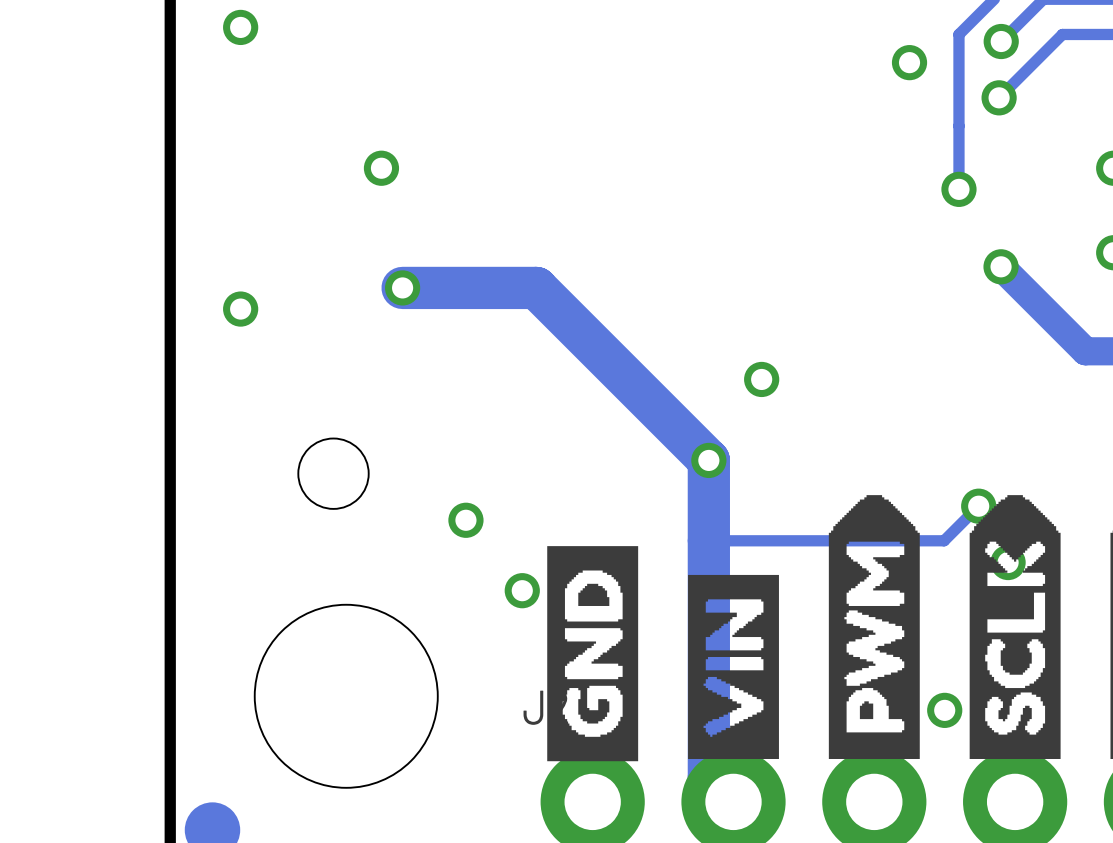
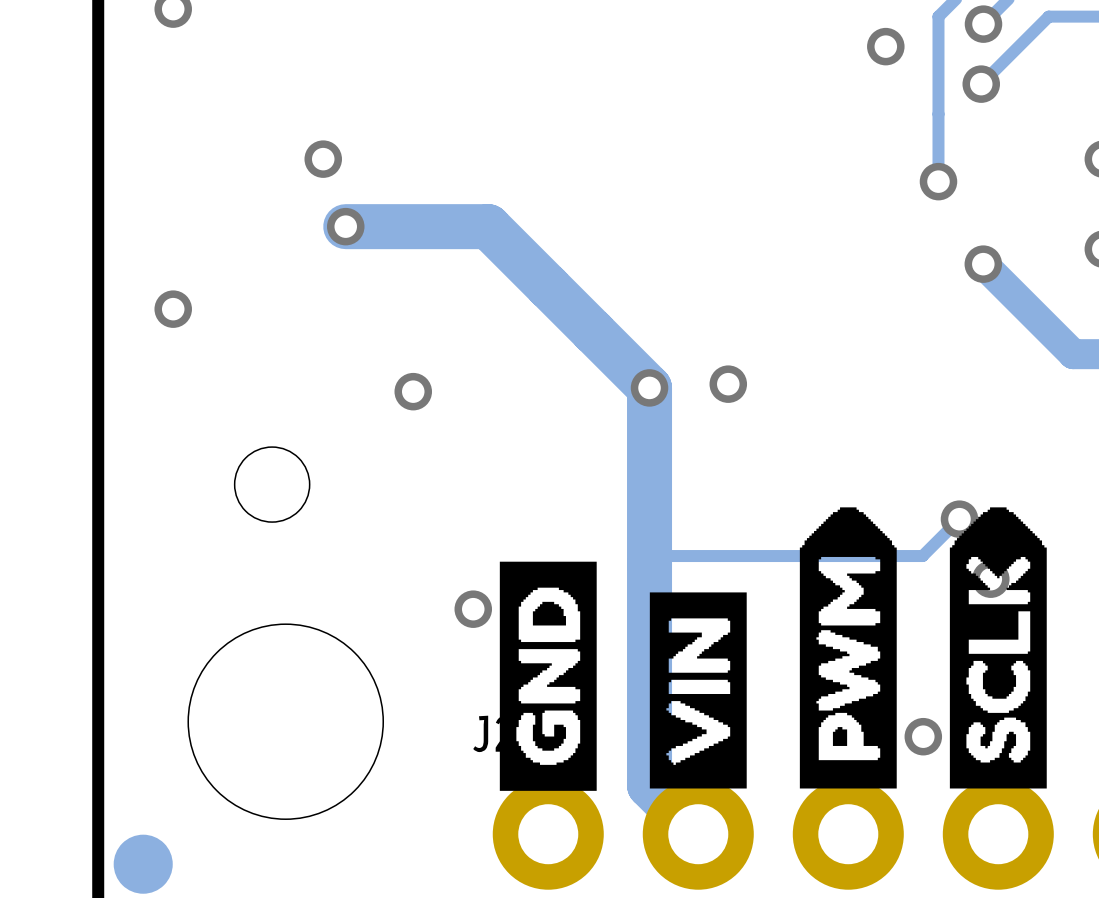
track: (402, 287) (536, 287) (708, 460) (708, 777) -> (345, 226) (488, 226) (649, 387) (649, 785) (672, 807)
via position: (402, 287) -> (345, 226)
via: none -> (413, 391)
via position: (708, 460) -> (649, 387)
via: (465, 520) -> none

